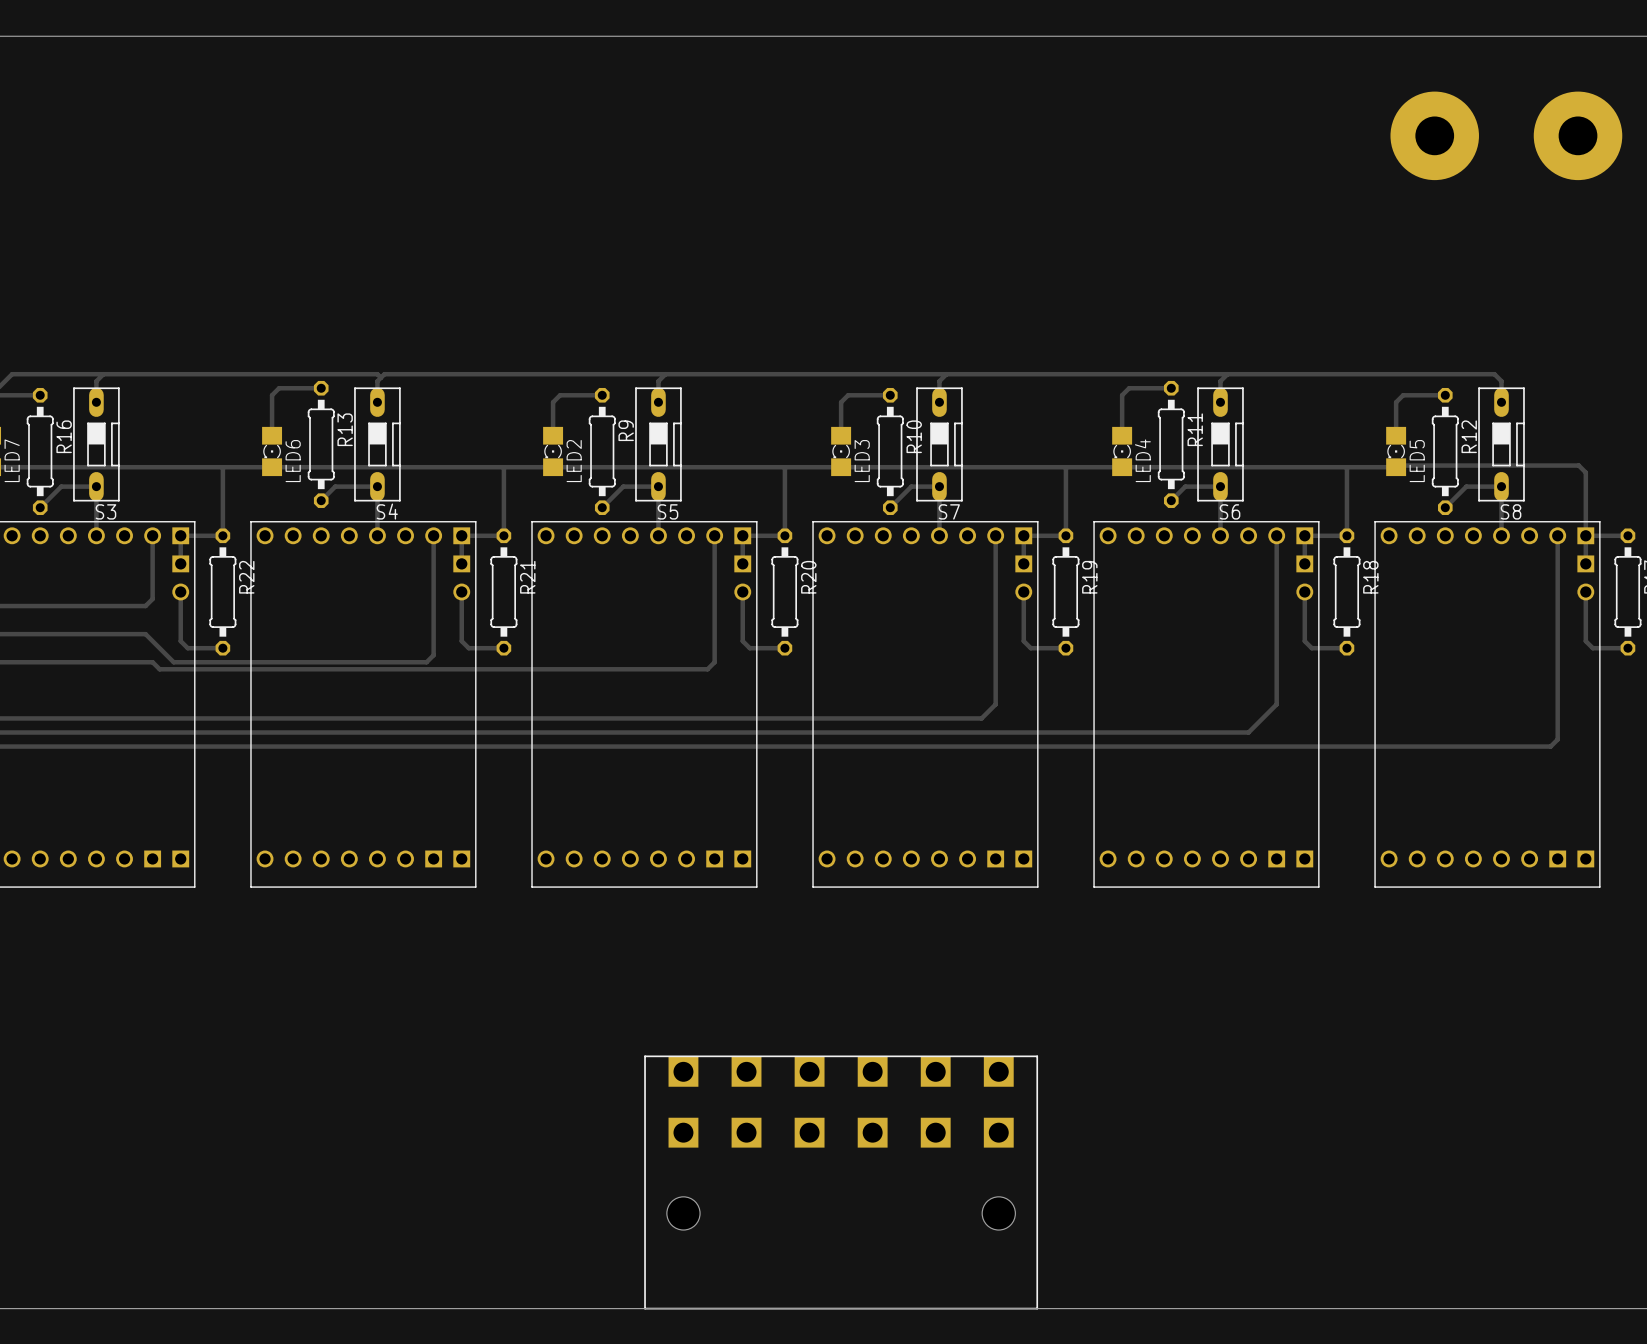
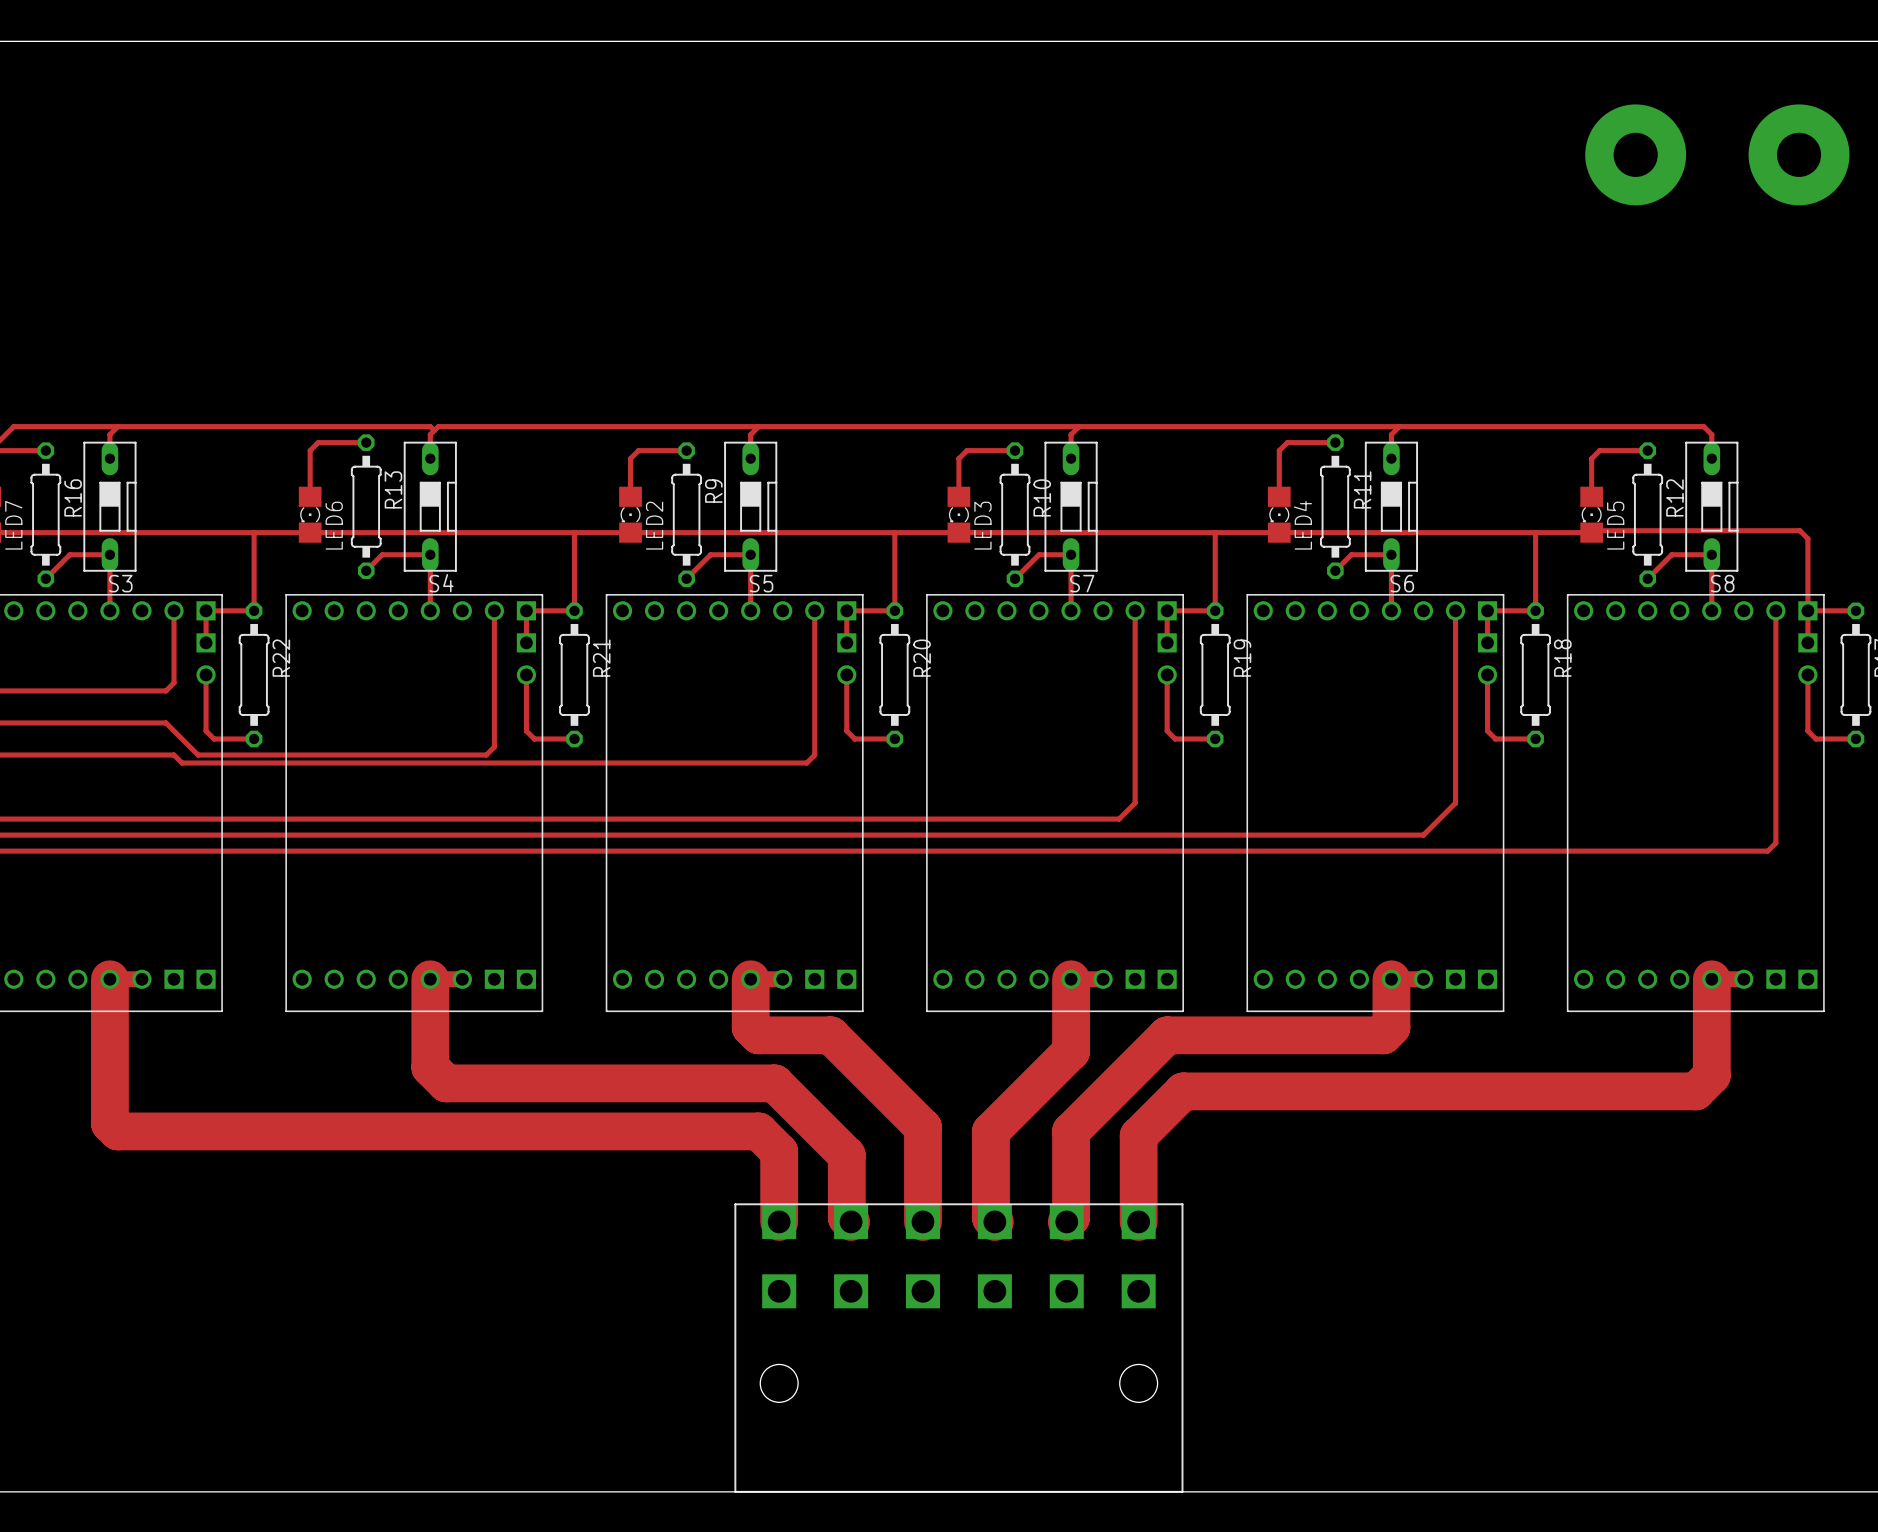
track: none -> (141, 979) (109, 979) (109, 1123) (117, 1131) (758, 1131) (779, 1151) (779, 1221)
track: none -> (462, 979) (430, 979) (430, 1067) (446, 1083) (774, 1083) (846, 1155) (846, 1217) (851, 1221)
track: none -> (782, 979) (750, 979) (750, 1027) (758, 1035) (830, 1035) (922, 1127) (922, 1221)
track: none -> (1103, 979) (1071, 979) (1071, 1051) (990, 1131) (990, 1218) (994, 1221)
track: none -> (1423, 979) (1391, 979) (1391, 1027) (1383, 1035) (1167, 1035) (1071, 1131) (1071, 1217) (1066, 1221)
track: none -> (1743, 979) (1711, 979) (1711, 1075) (1695, 1091) (1183, 1091) (1138, 1135) (1138, 1221)

